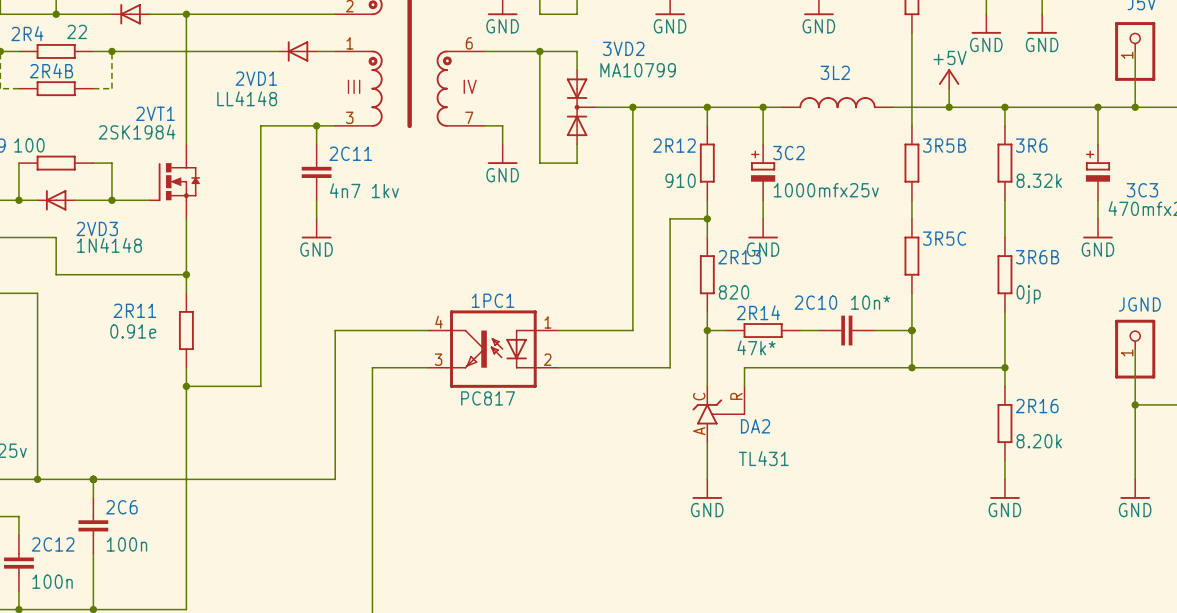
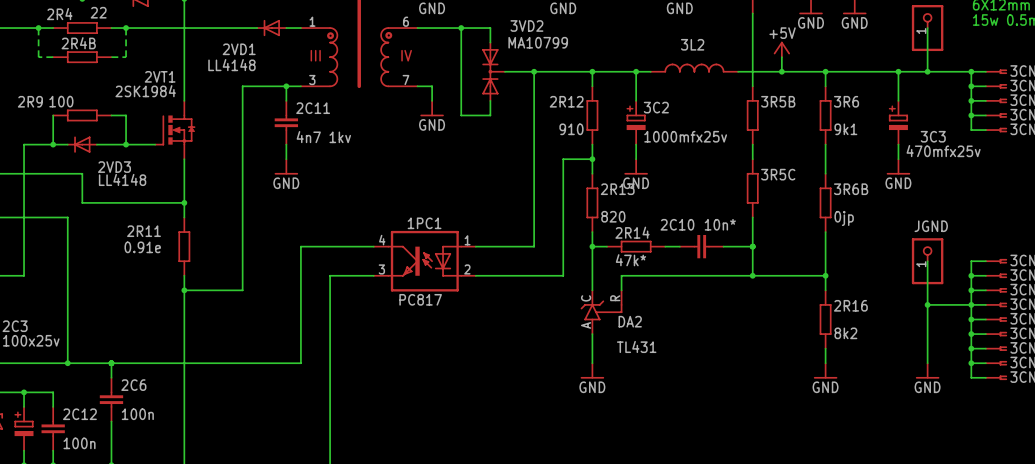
3R6 value: 8.32k (1039, 180) -> 9k1 (845, 129)
2VD3 value: 1N4148 (109, 245) -> LL4148 (122, 179)
2R16 value: 8.20k (1039, 441) -> 8k2 (845, 333)

